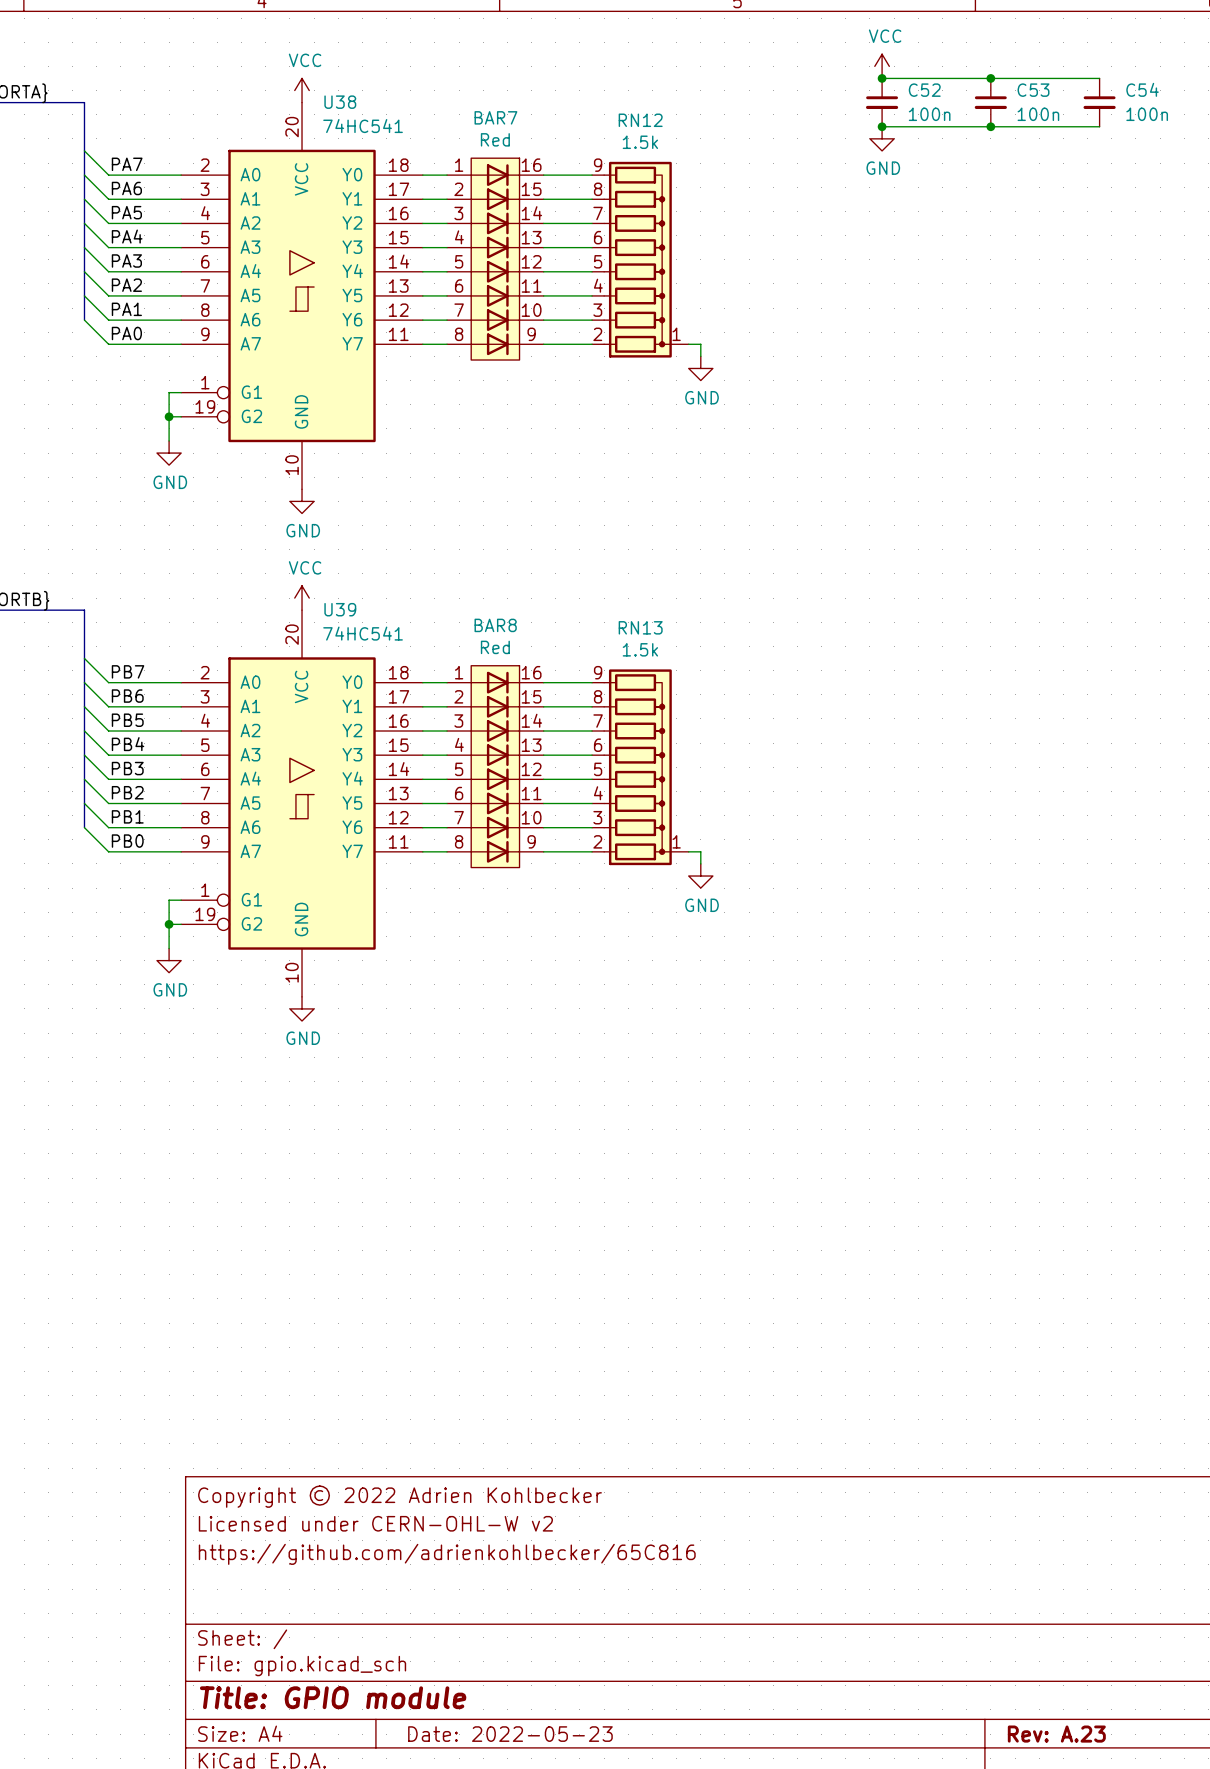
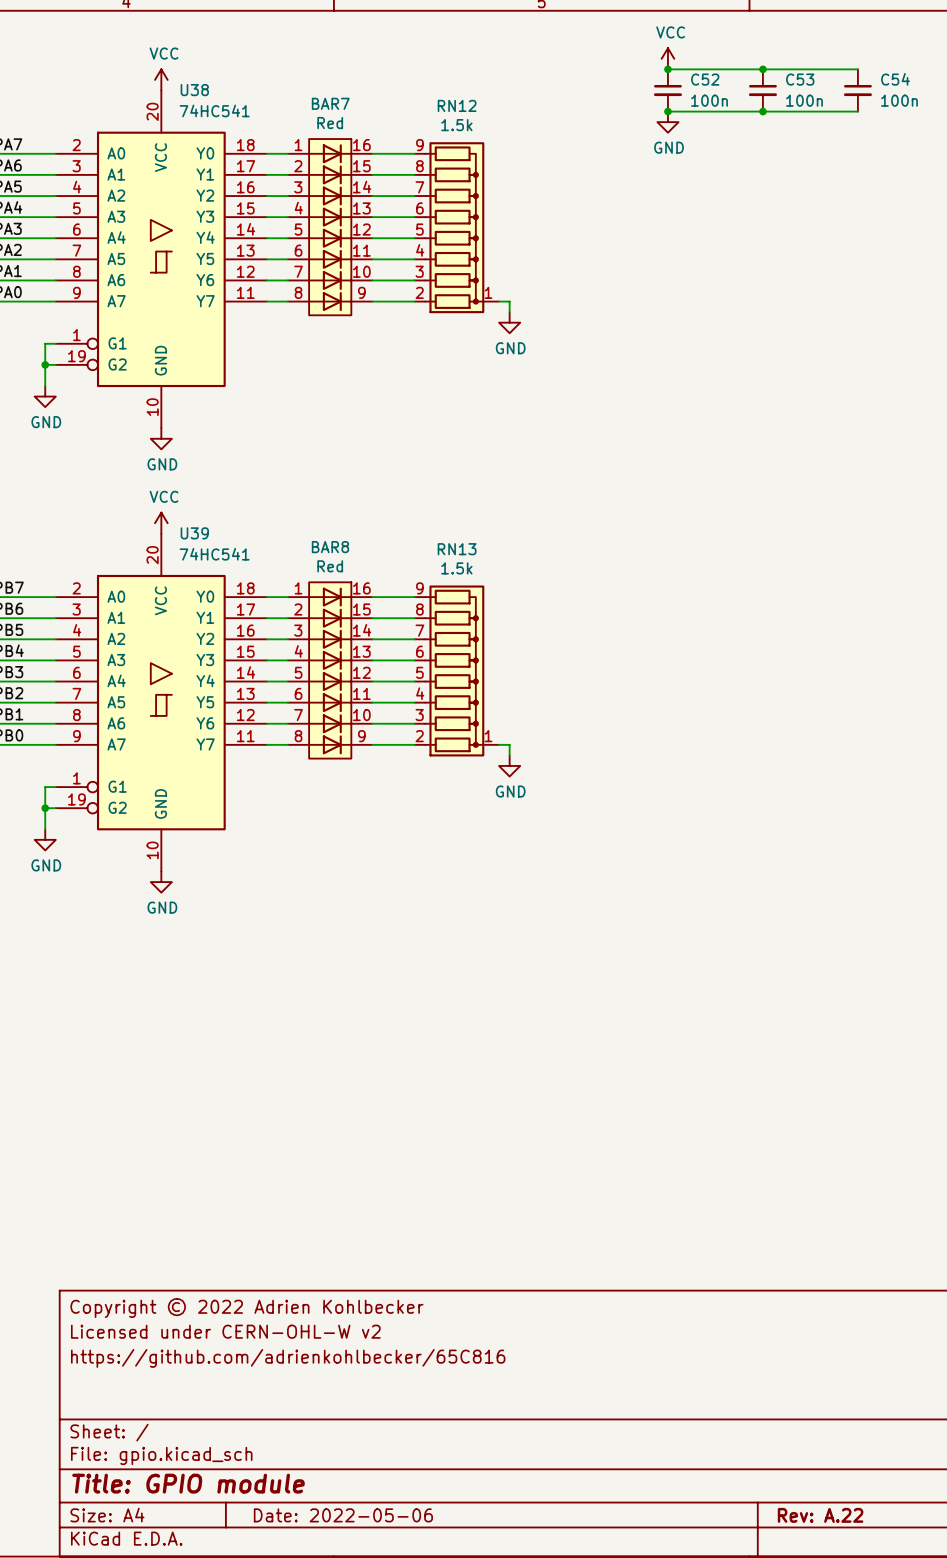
title block: Date: 2022-05-23 (510, 1734) -> Date: 2022-05-06 (343, 1515)
title block: Rev: A.23 (1056, 1734) -> Rev: A.22 (820, 1515)

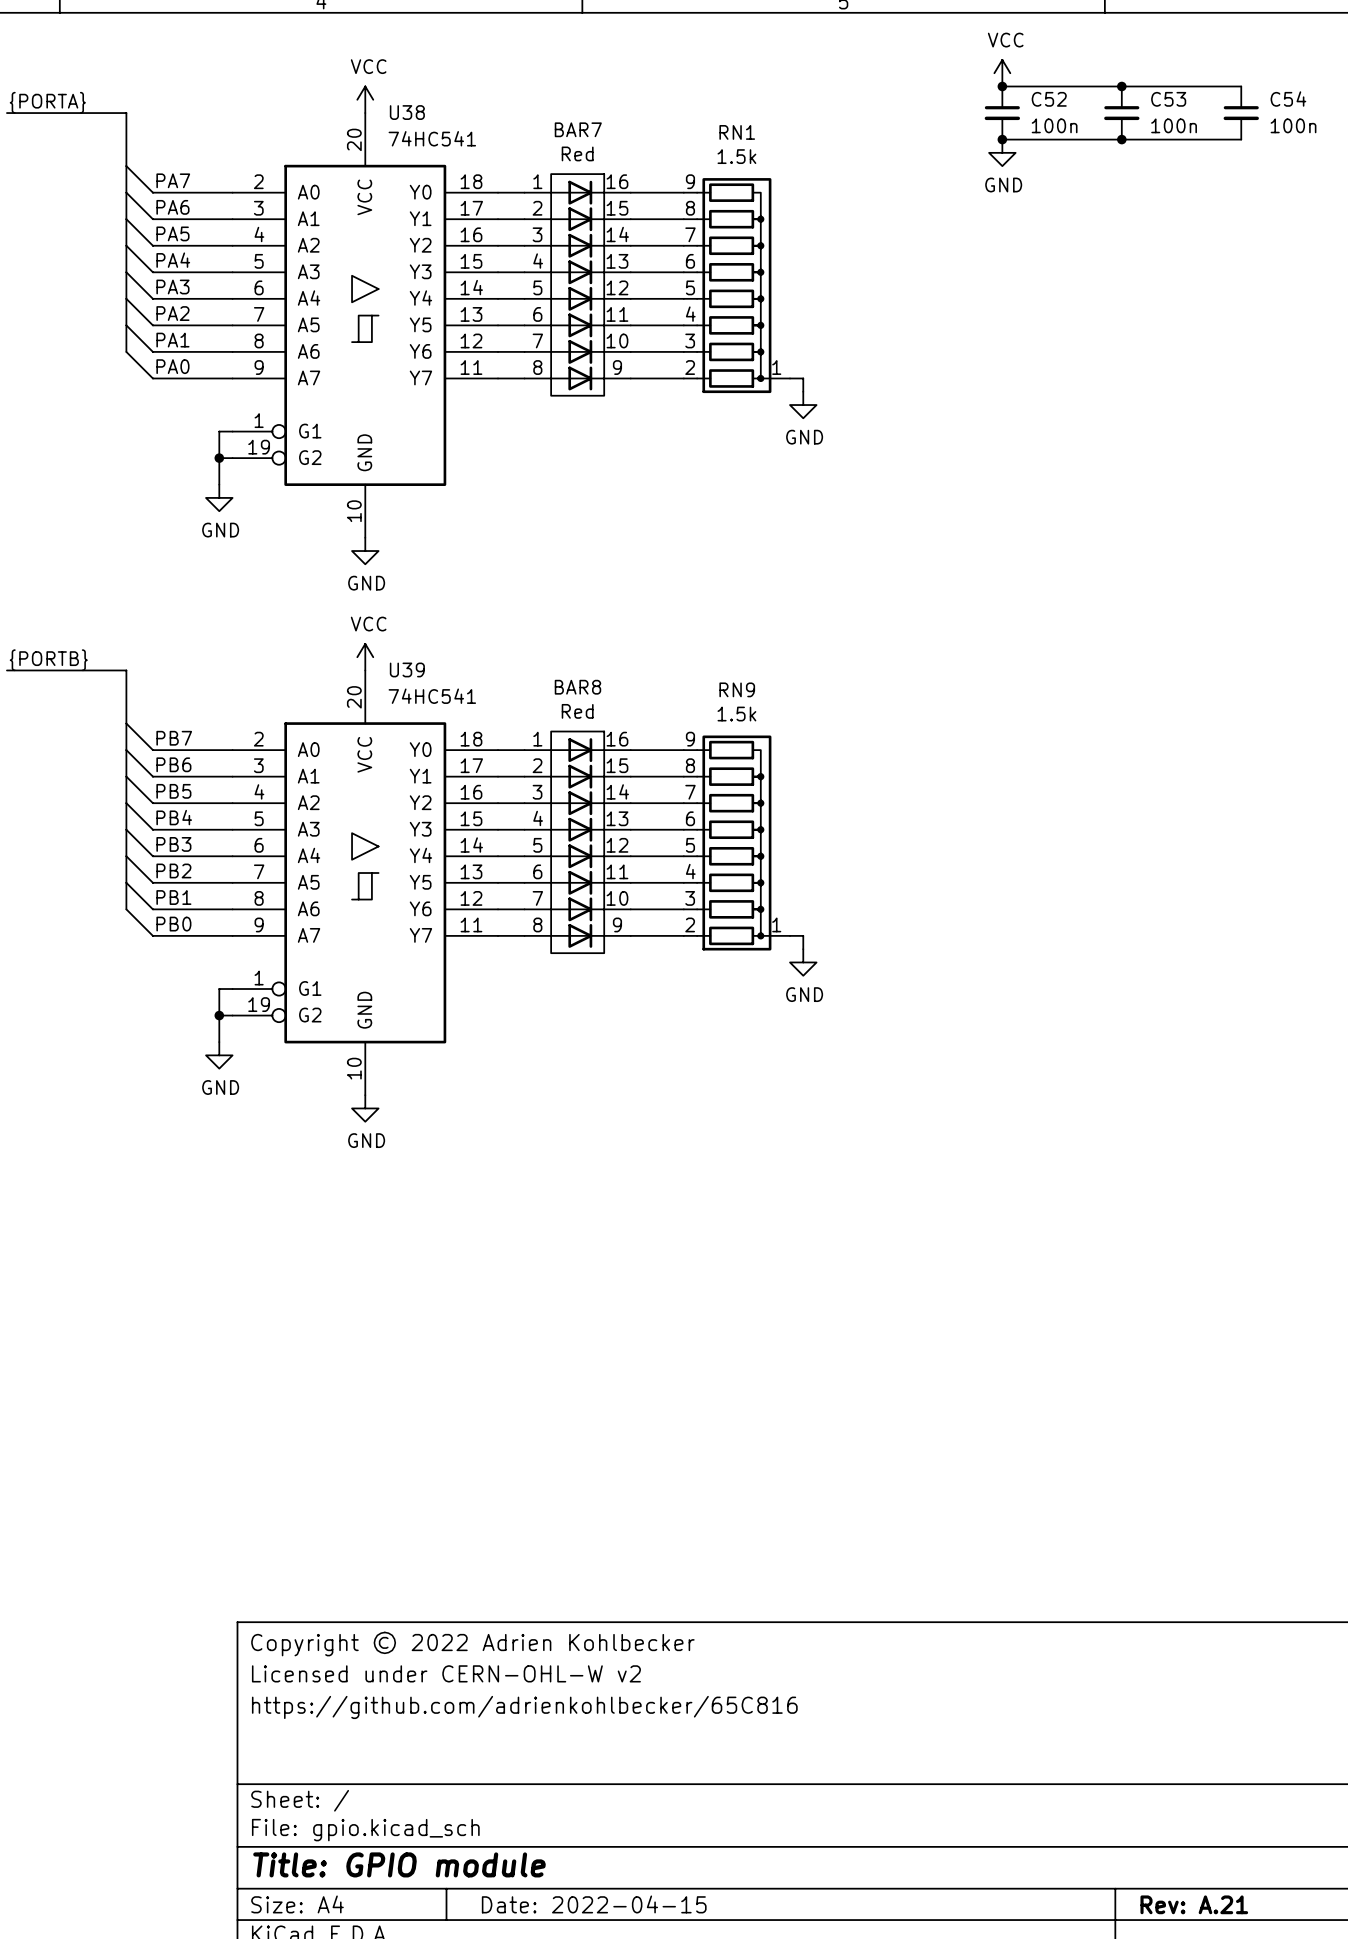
RN12 name: RN12 (457, 105) -> RN1 (737, 132)
RN13 name: RN13 (457, 549) -> RN9 (737, 689)
title block: Date: 2022-05-06 (343, 1515) -> Date: 2022-04-15 (594, 1904)
title block: Rev: A.22 (820, 1515) -> Rev: A.21 (1194, 1904)

